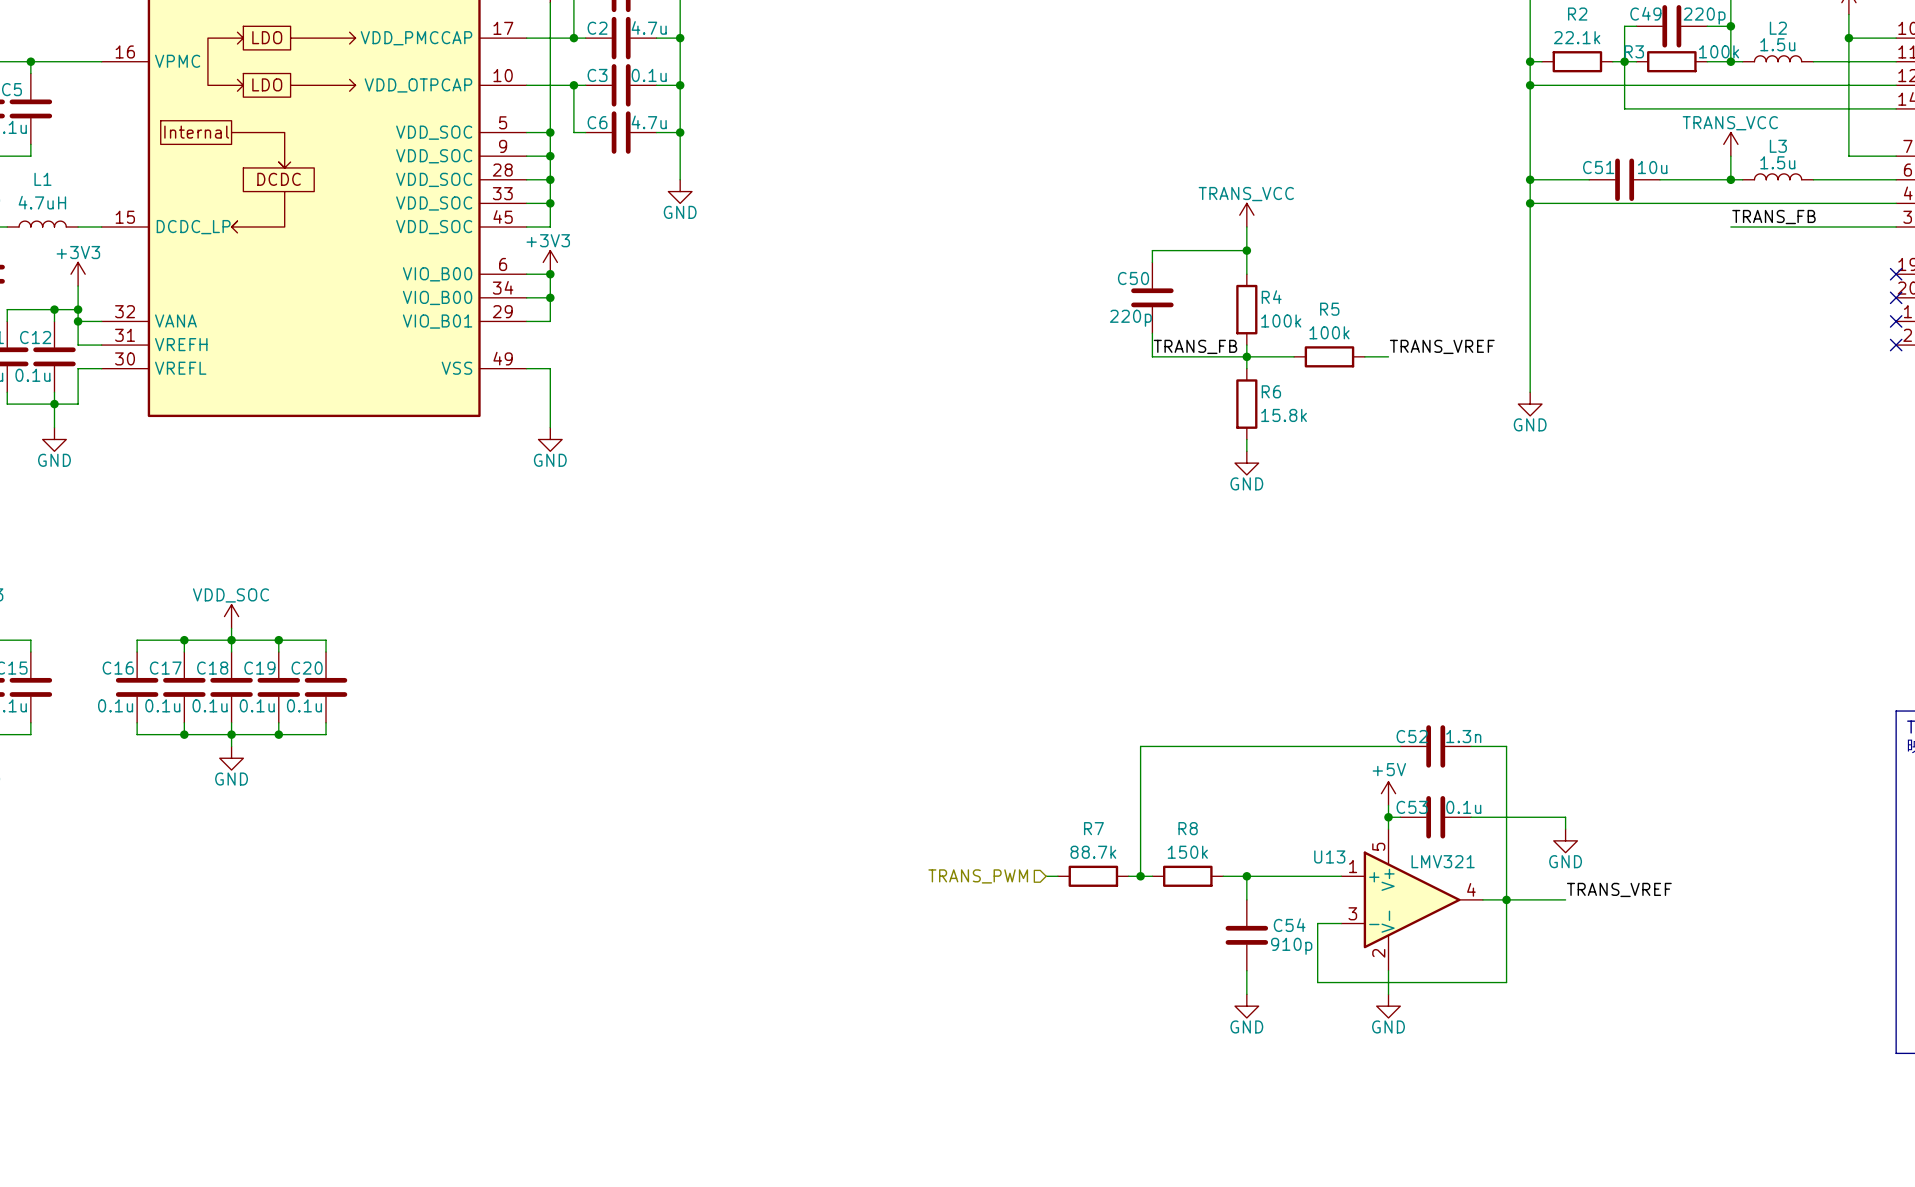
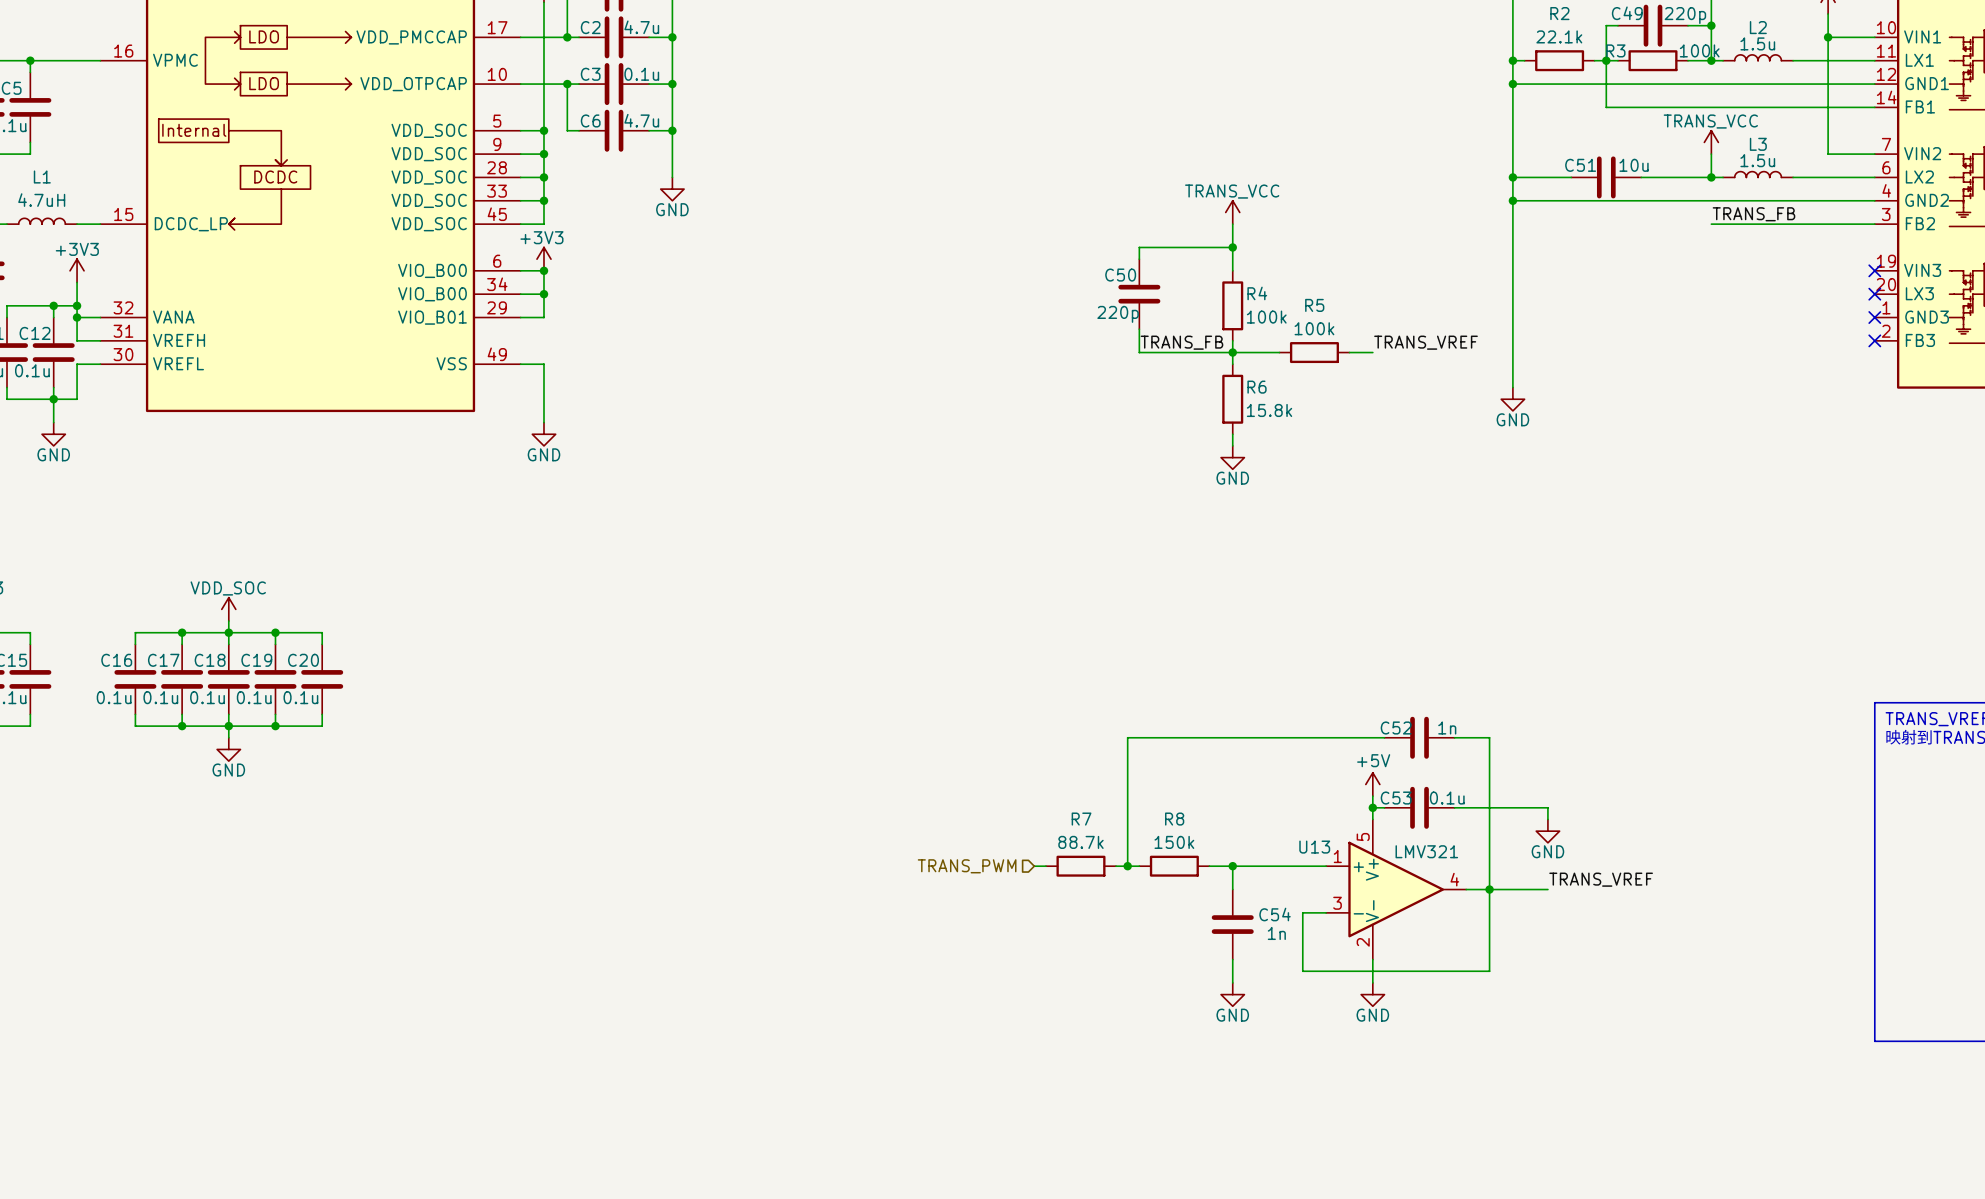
C52 value: 1.3n (1463, 736) -> 1n (1447, 728)
C54 value: 910p (1291, 946) -> 1n (1276, 933)

